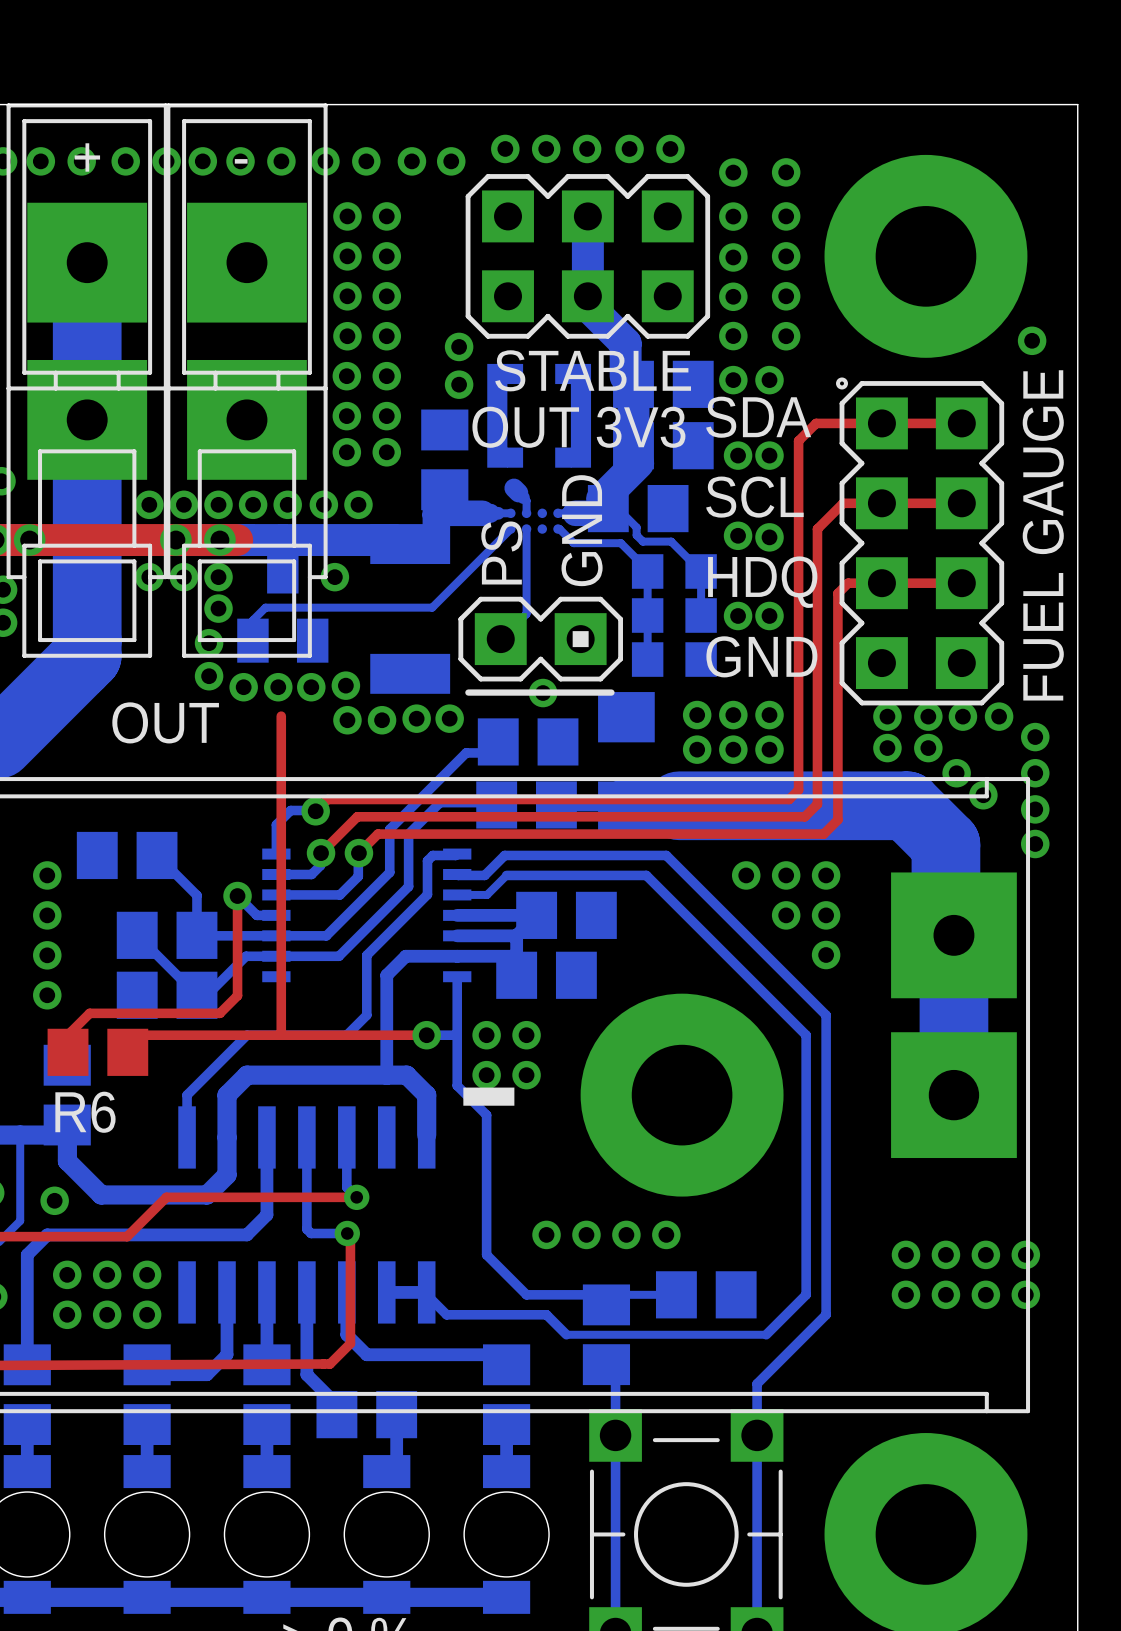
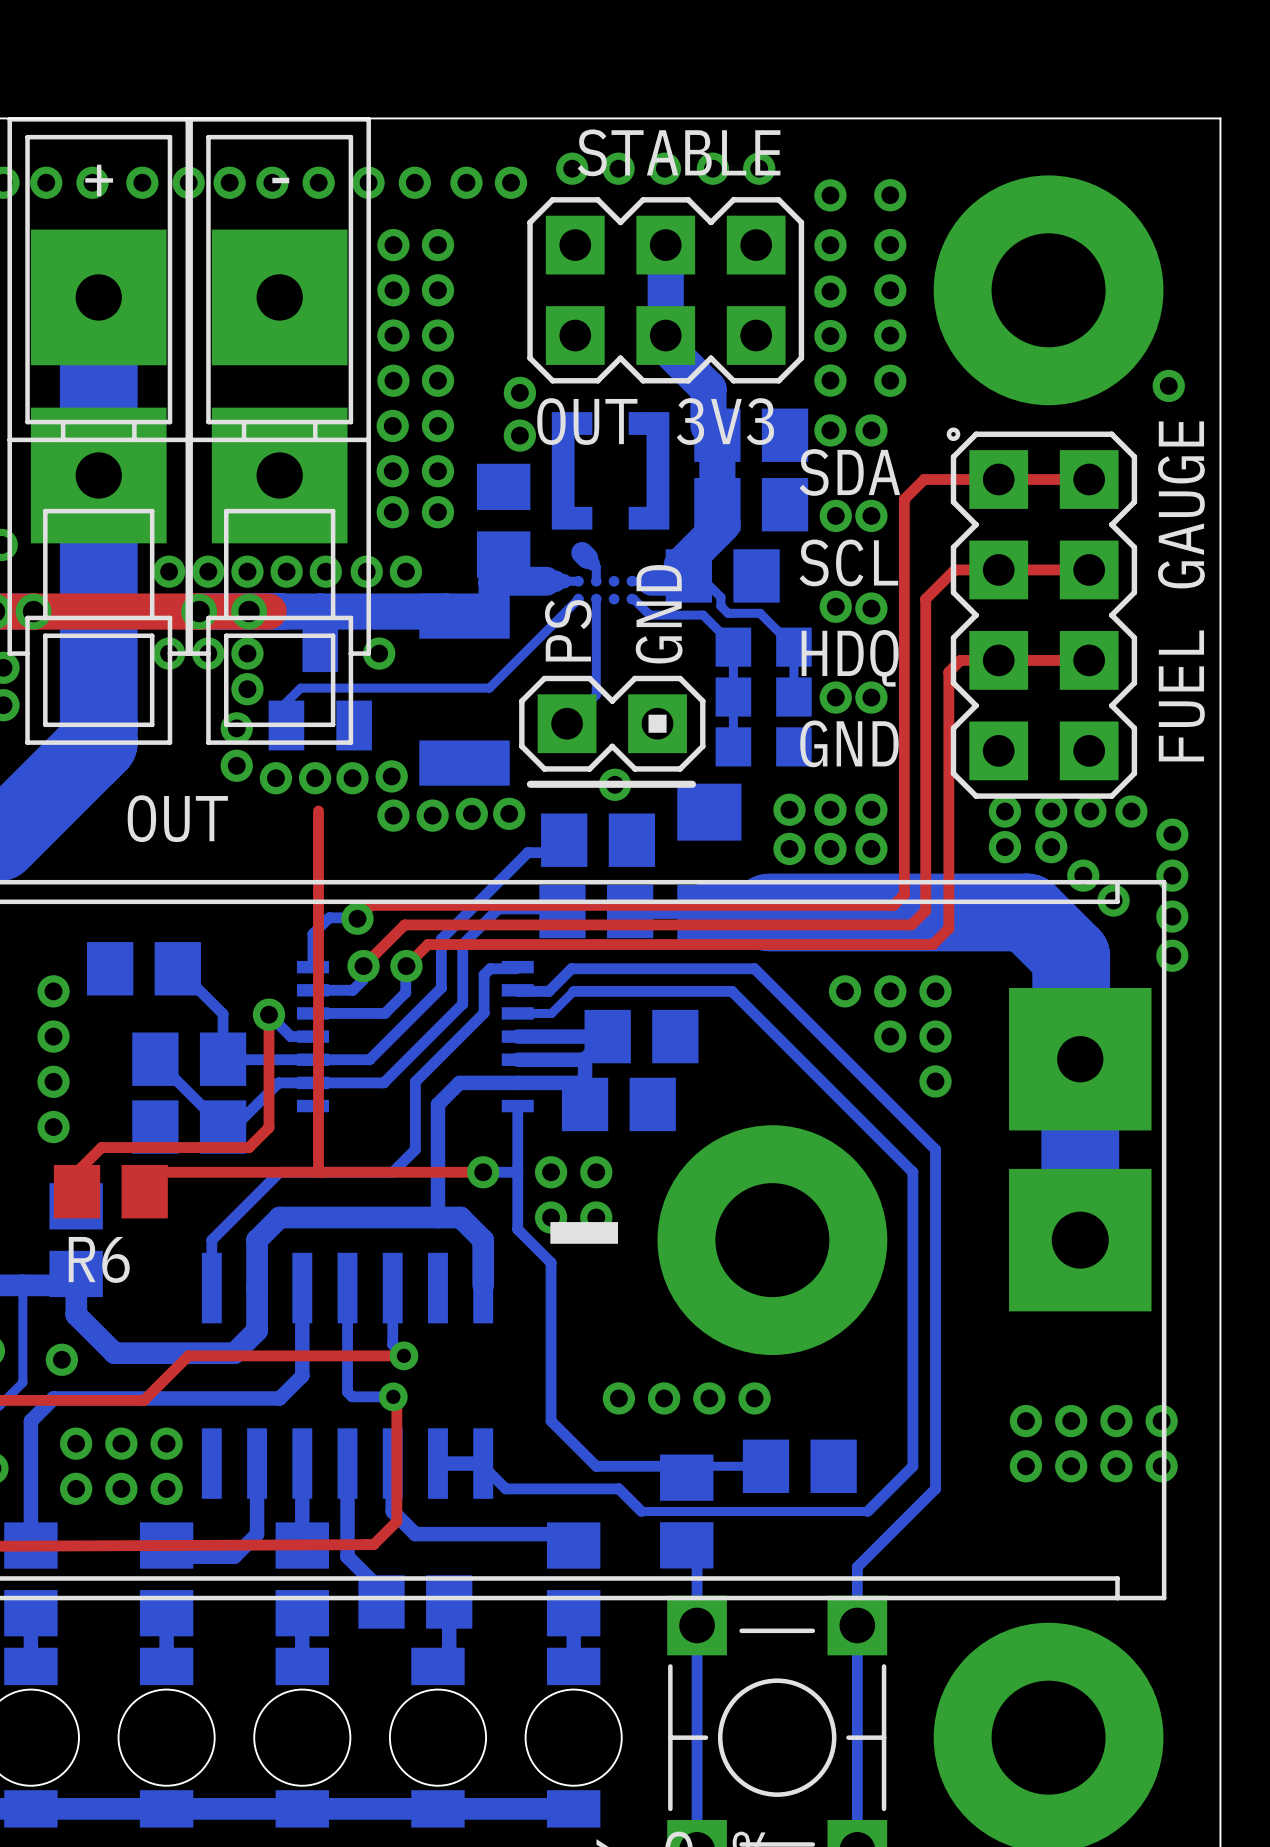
text position: STABLE (593, 370) -> STABLE (679, 152)
text position: OUT 3V3 (578, 427) -> OUT 3V3 (655, 421)

